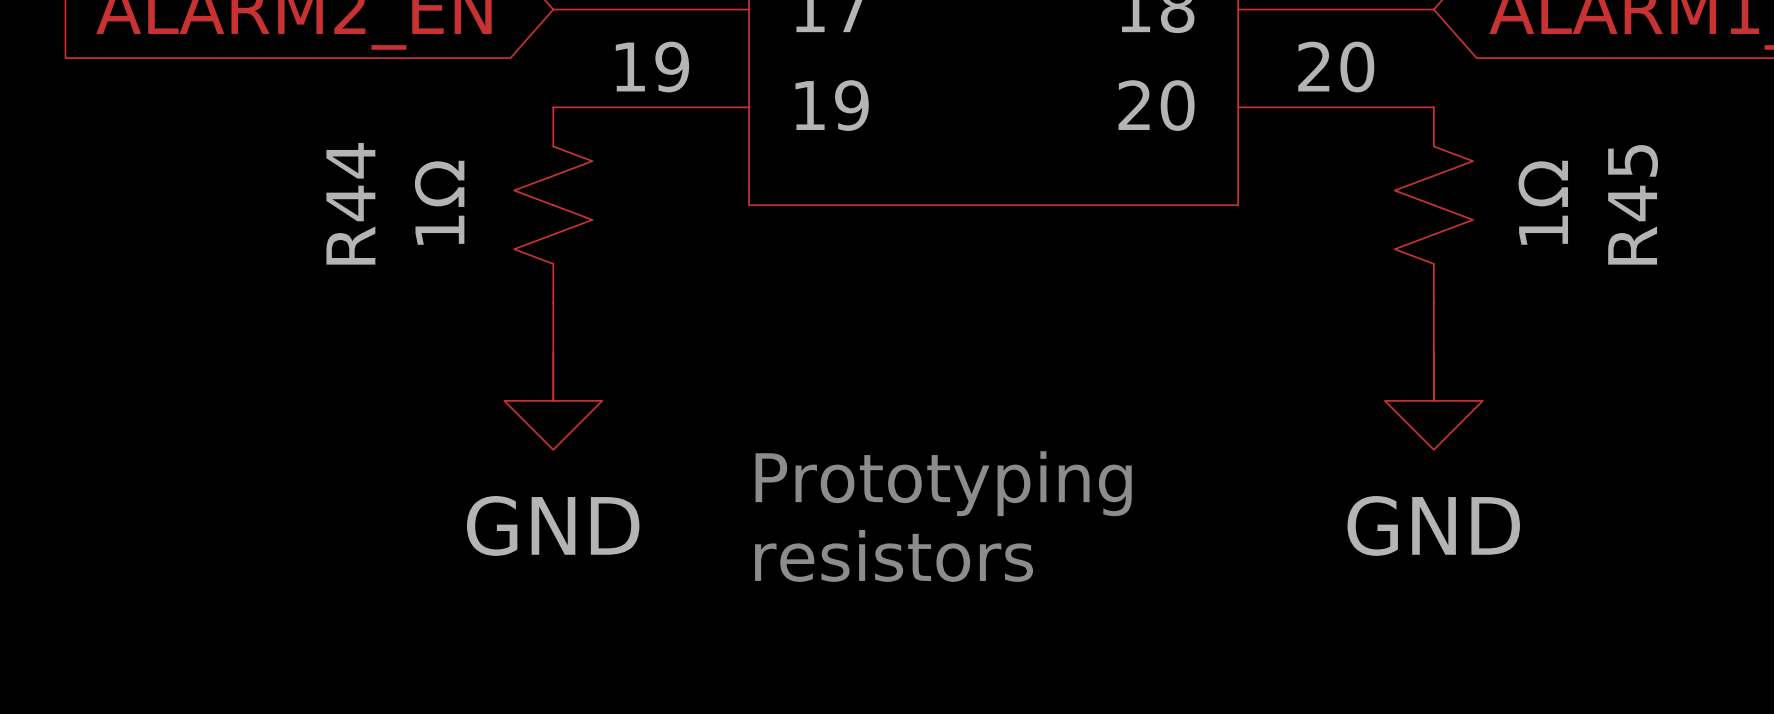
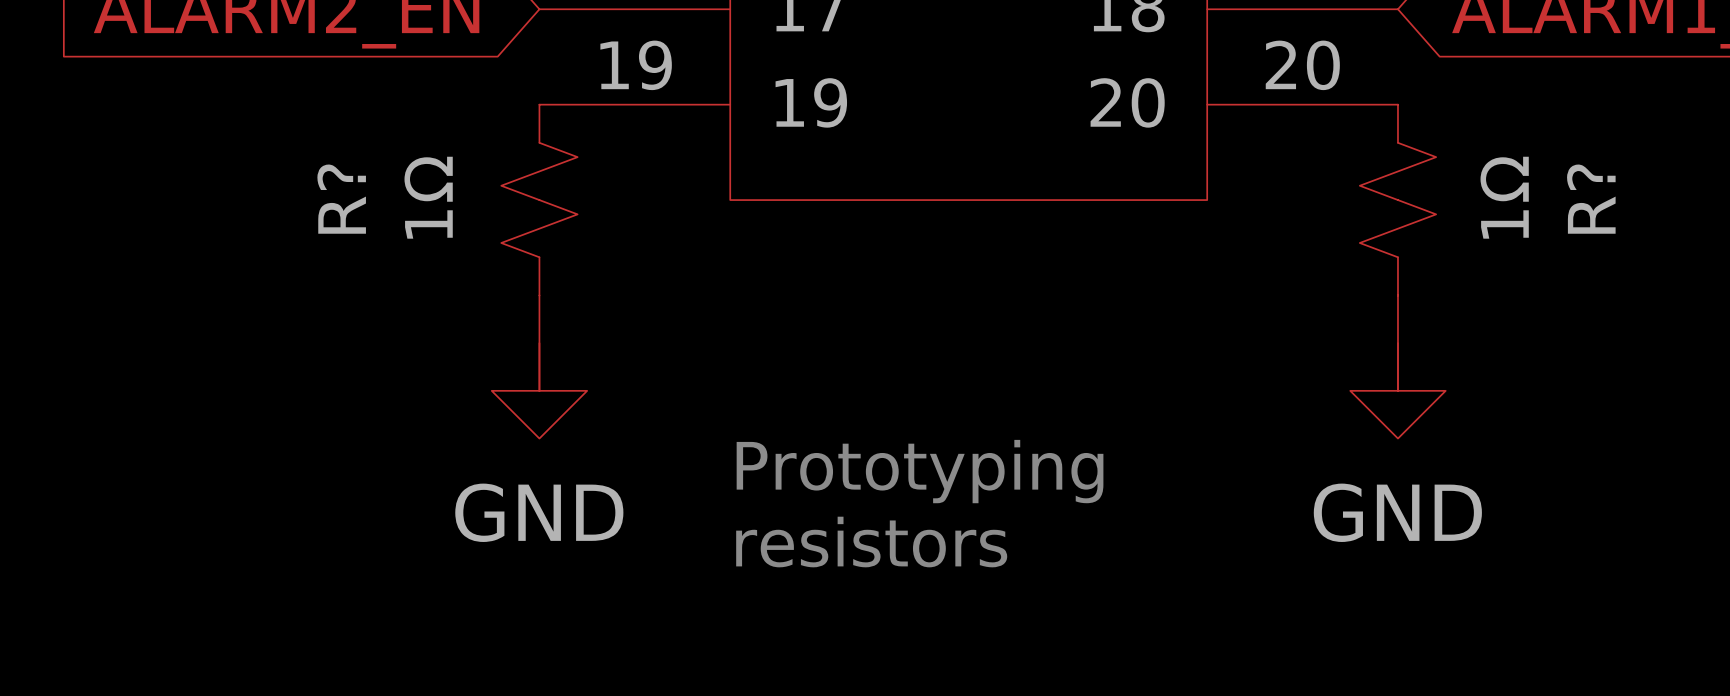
R44 name: R44 (350, 203) -> R? (341, 199)
R45 name: R45 (1633, 204) -> R? (1591, 199)

